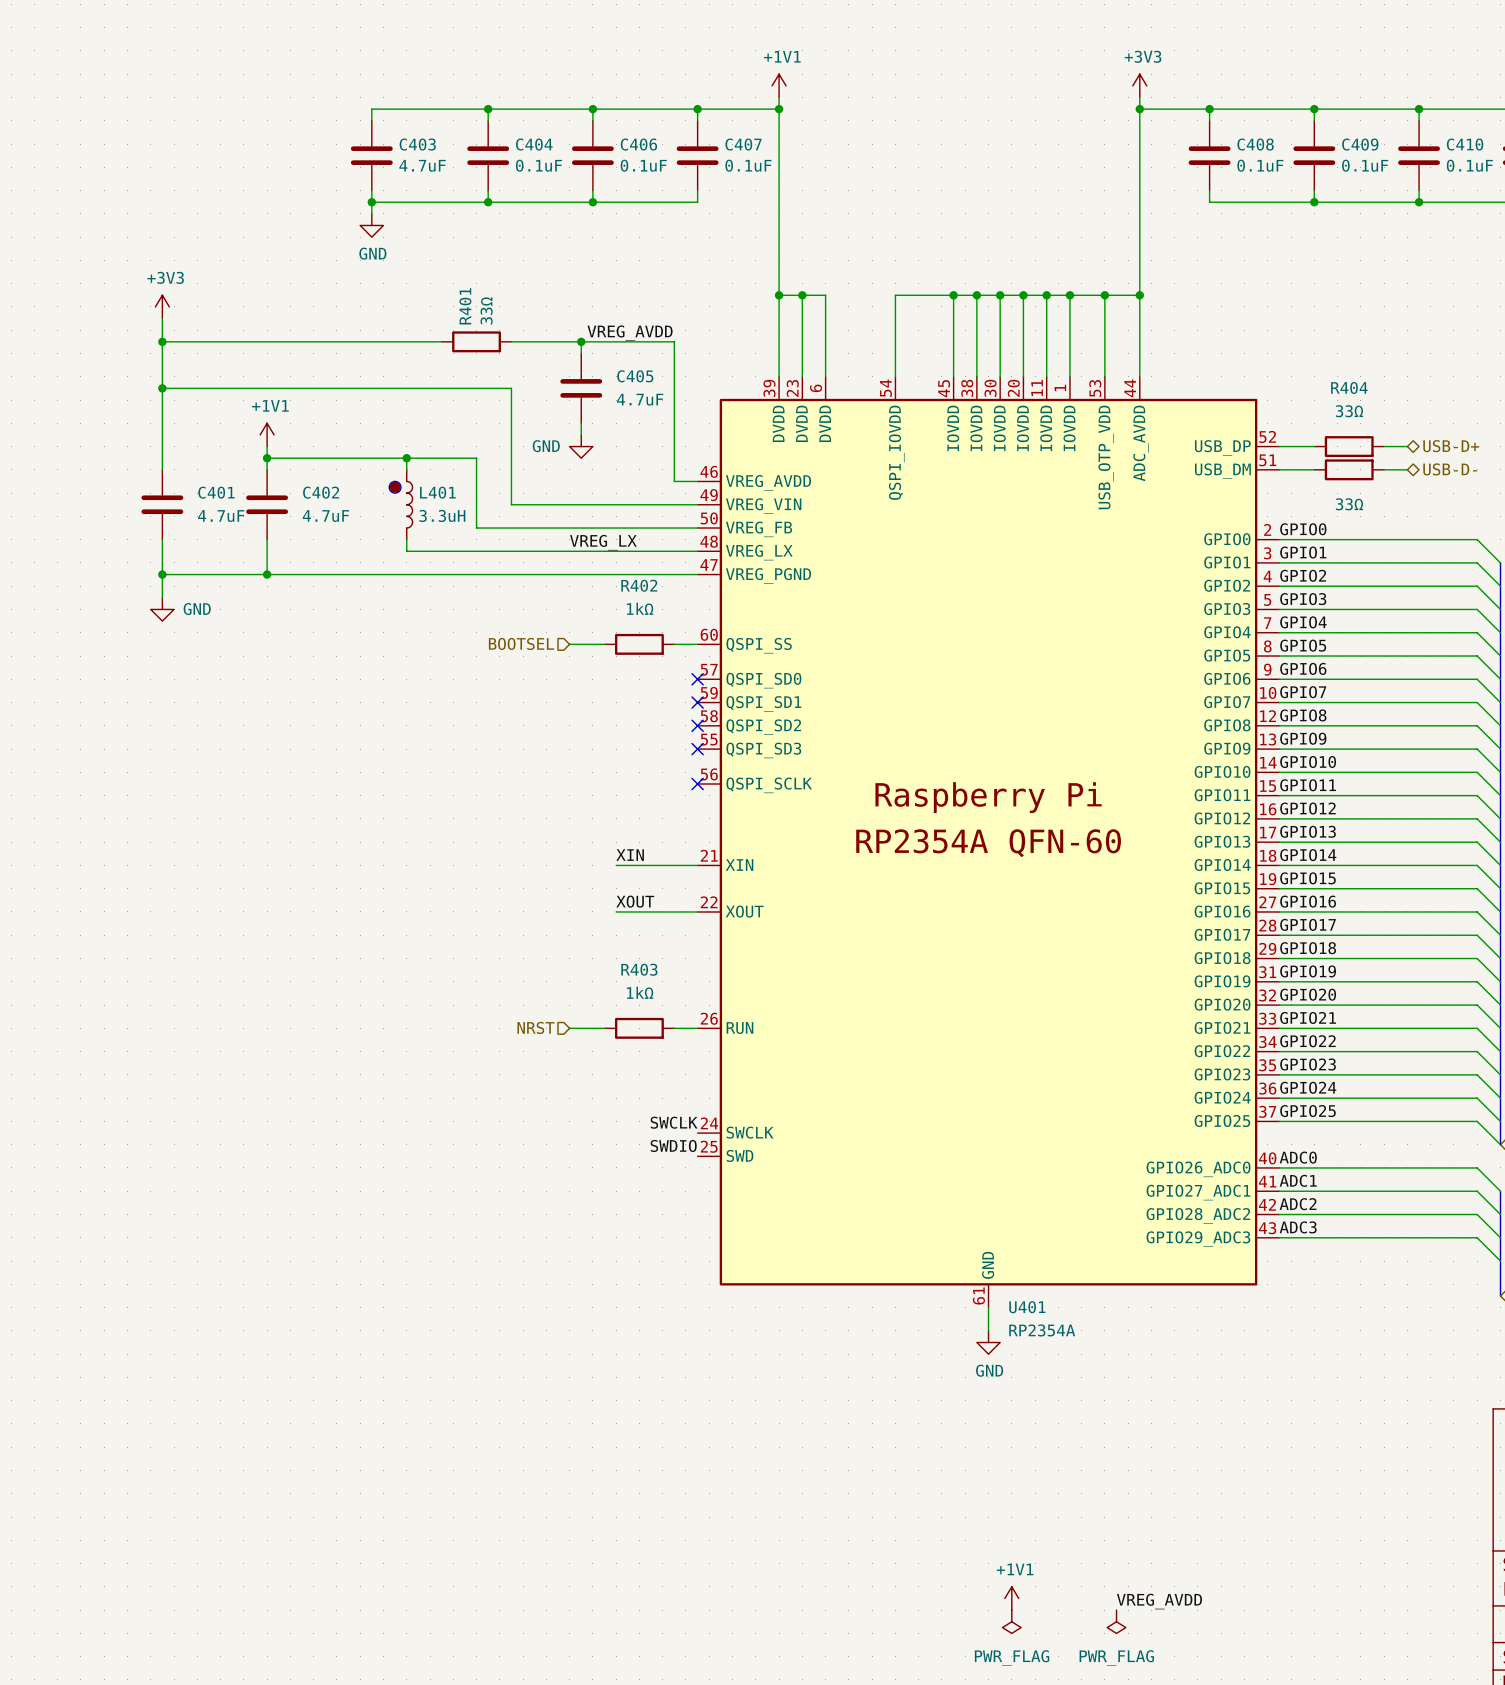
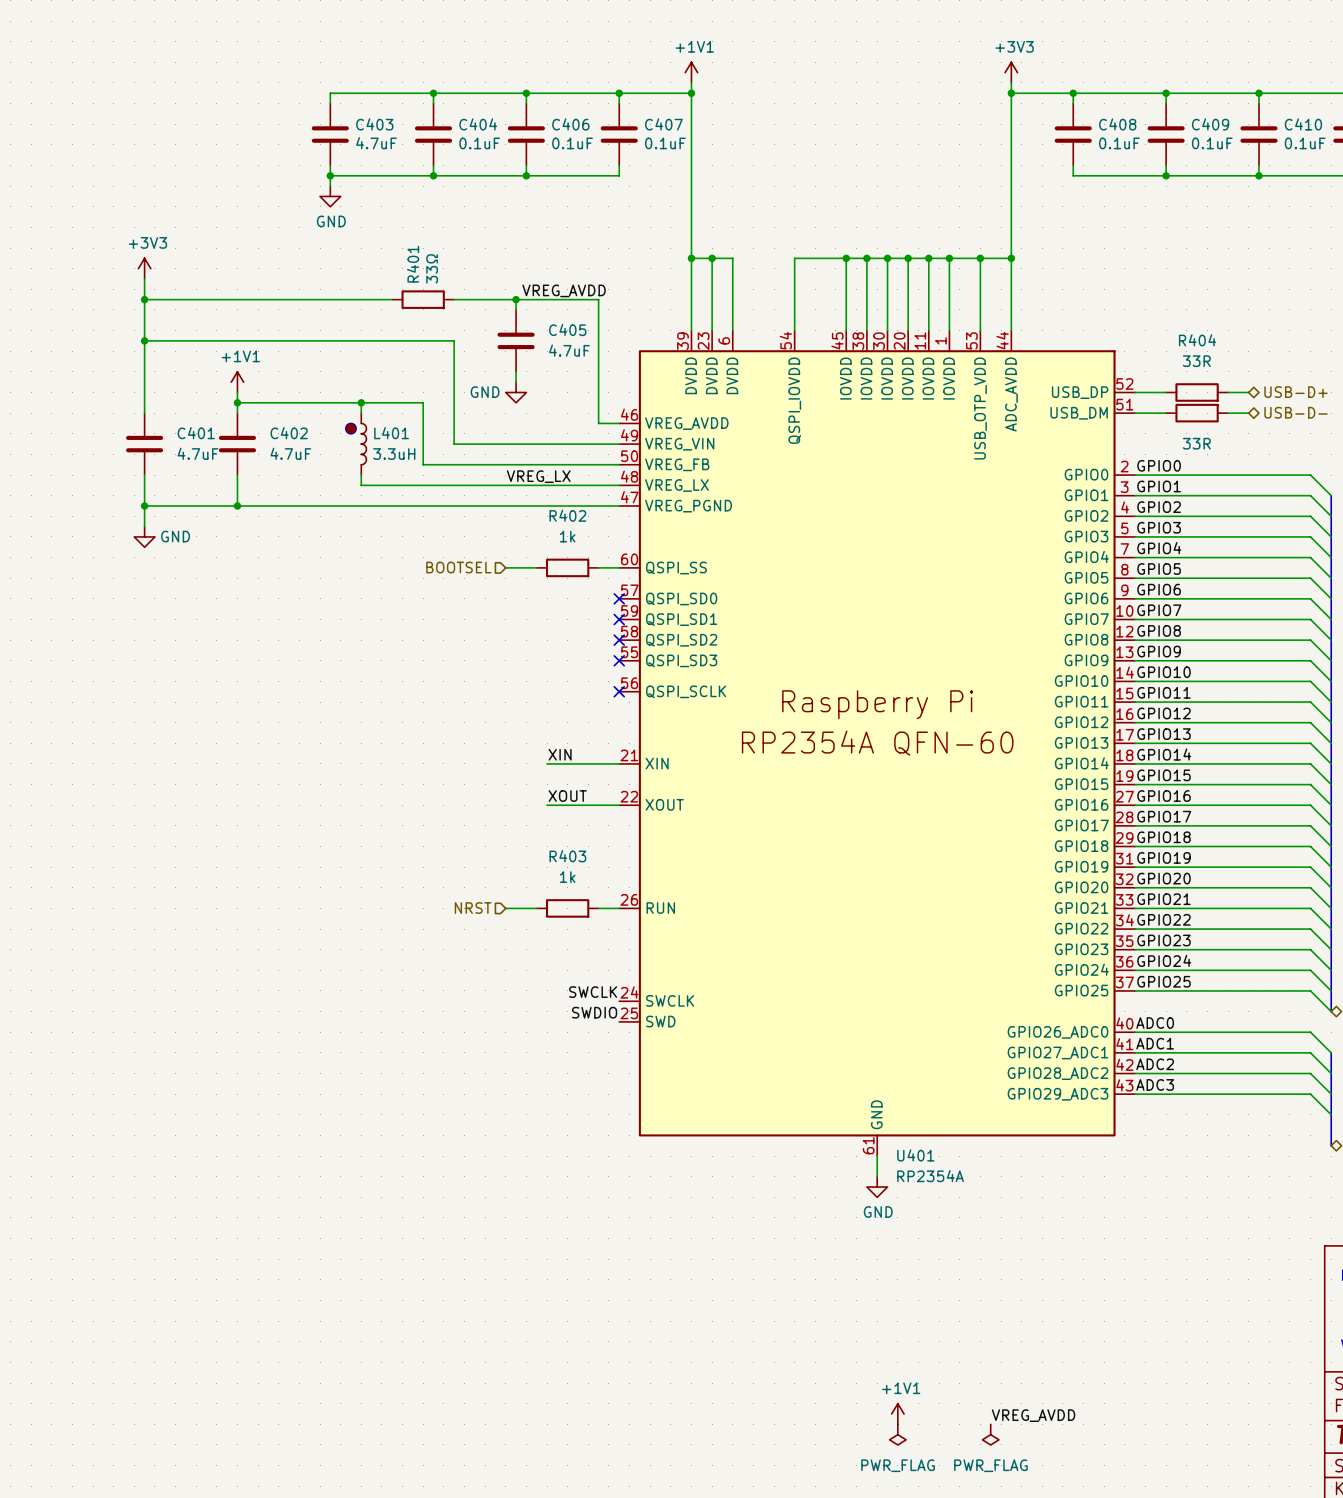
R404 value: 33Ω (1349, 411) -> 33R (1196, 361)
part value: 33Ω (1349, 504) -> 33R (1196, 443)
R402 value: 1kΩ (640, 608) -> 1k (567, 536)
R403 value: 1kΩ (640, 992) -> 1k (567, 877)

